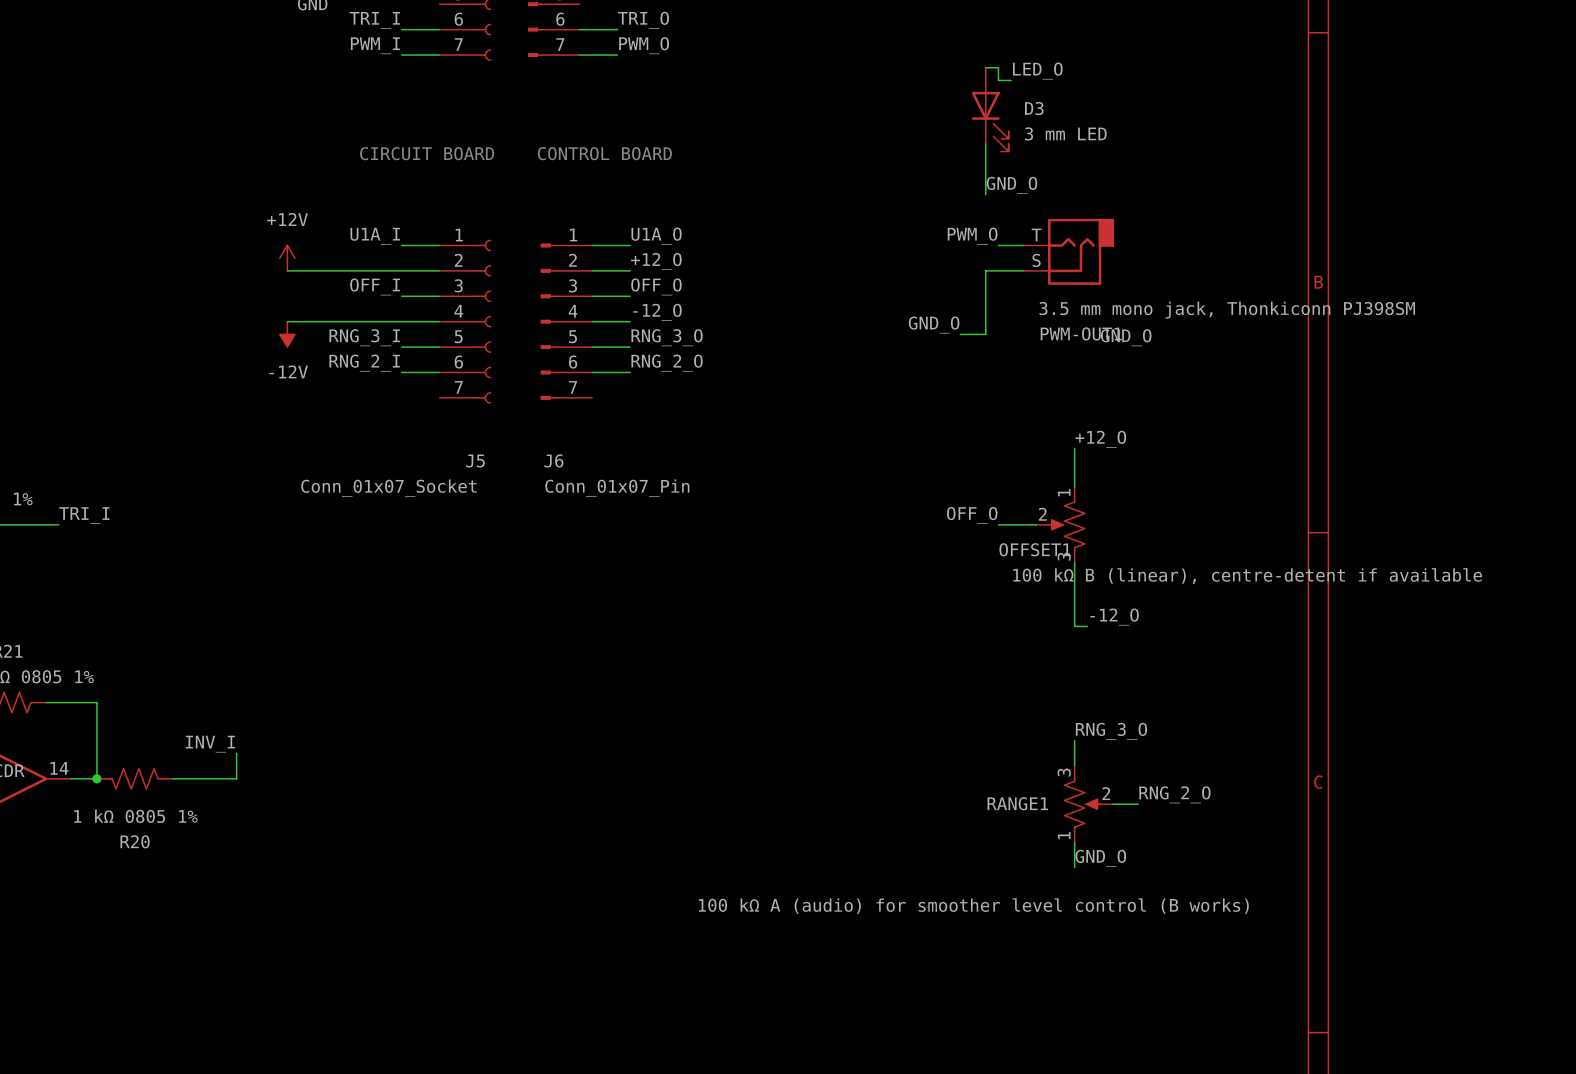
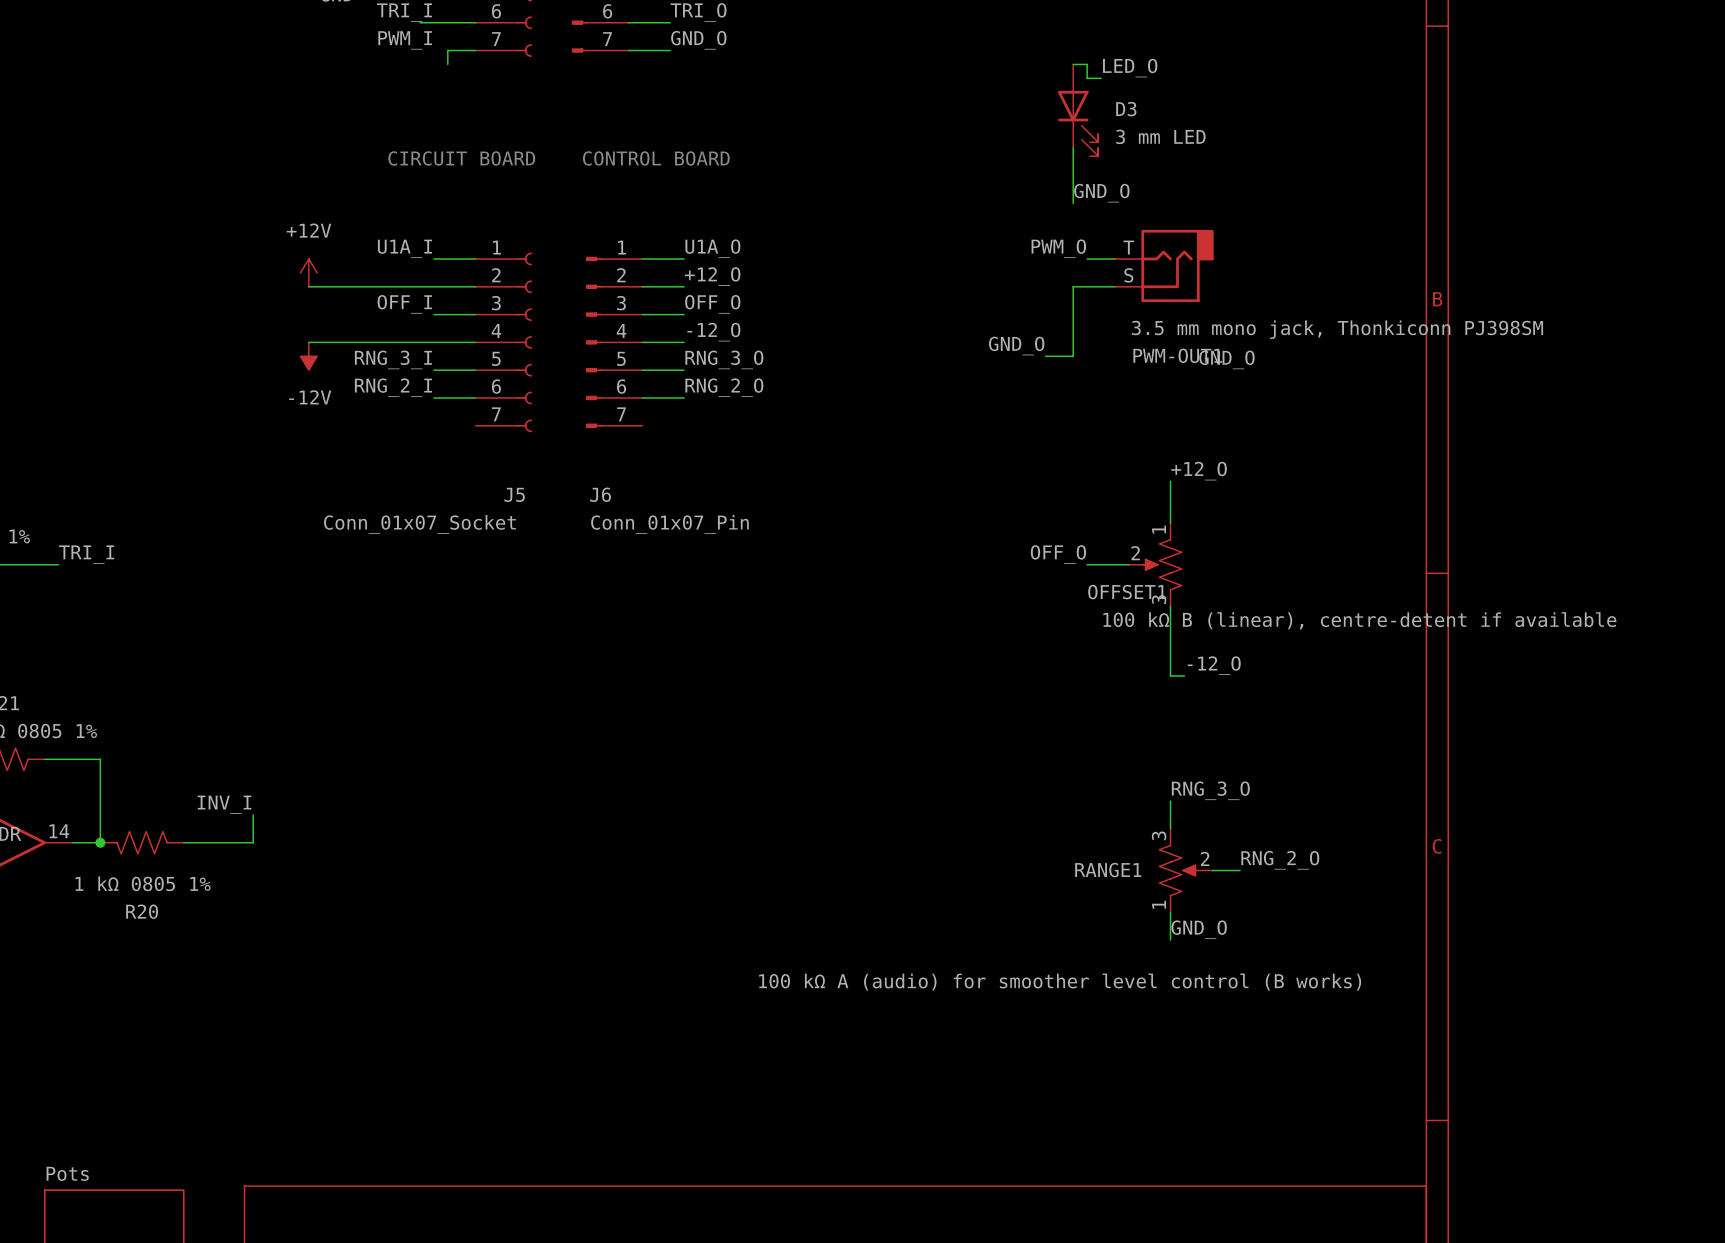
wire: none -> (420, 22) (433, 22)
label: PWM_O (644, 45) -> GND_O (698, 40)
wire: (401, 55) (414, 55) -> (447, 64) (447, 50)

